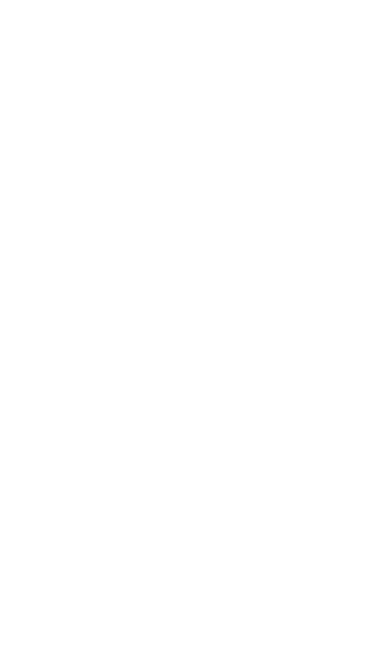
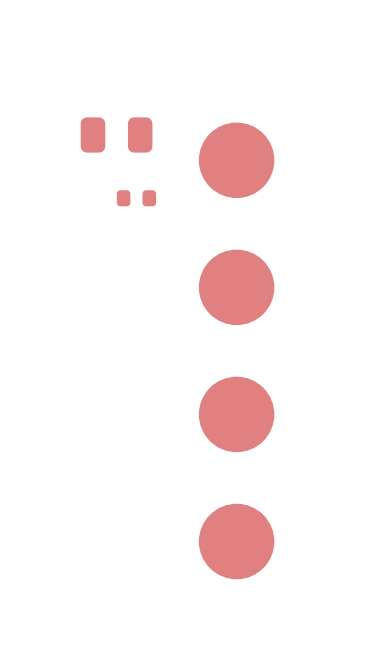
part: none -> (116, 134)
part: none -> (236, 160)
part: none -> (136, 198)
part: none -> (236, 287)
part: none -> (236, 414)
part: none -> (236, 541)

